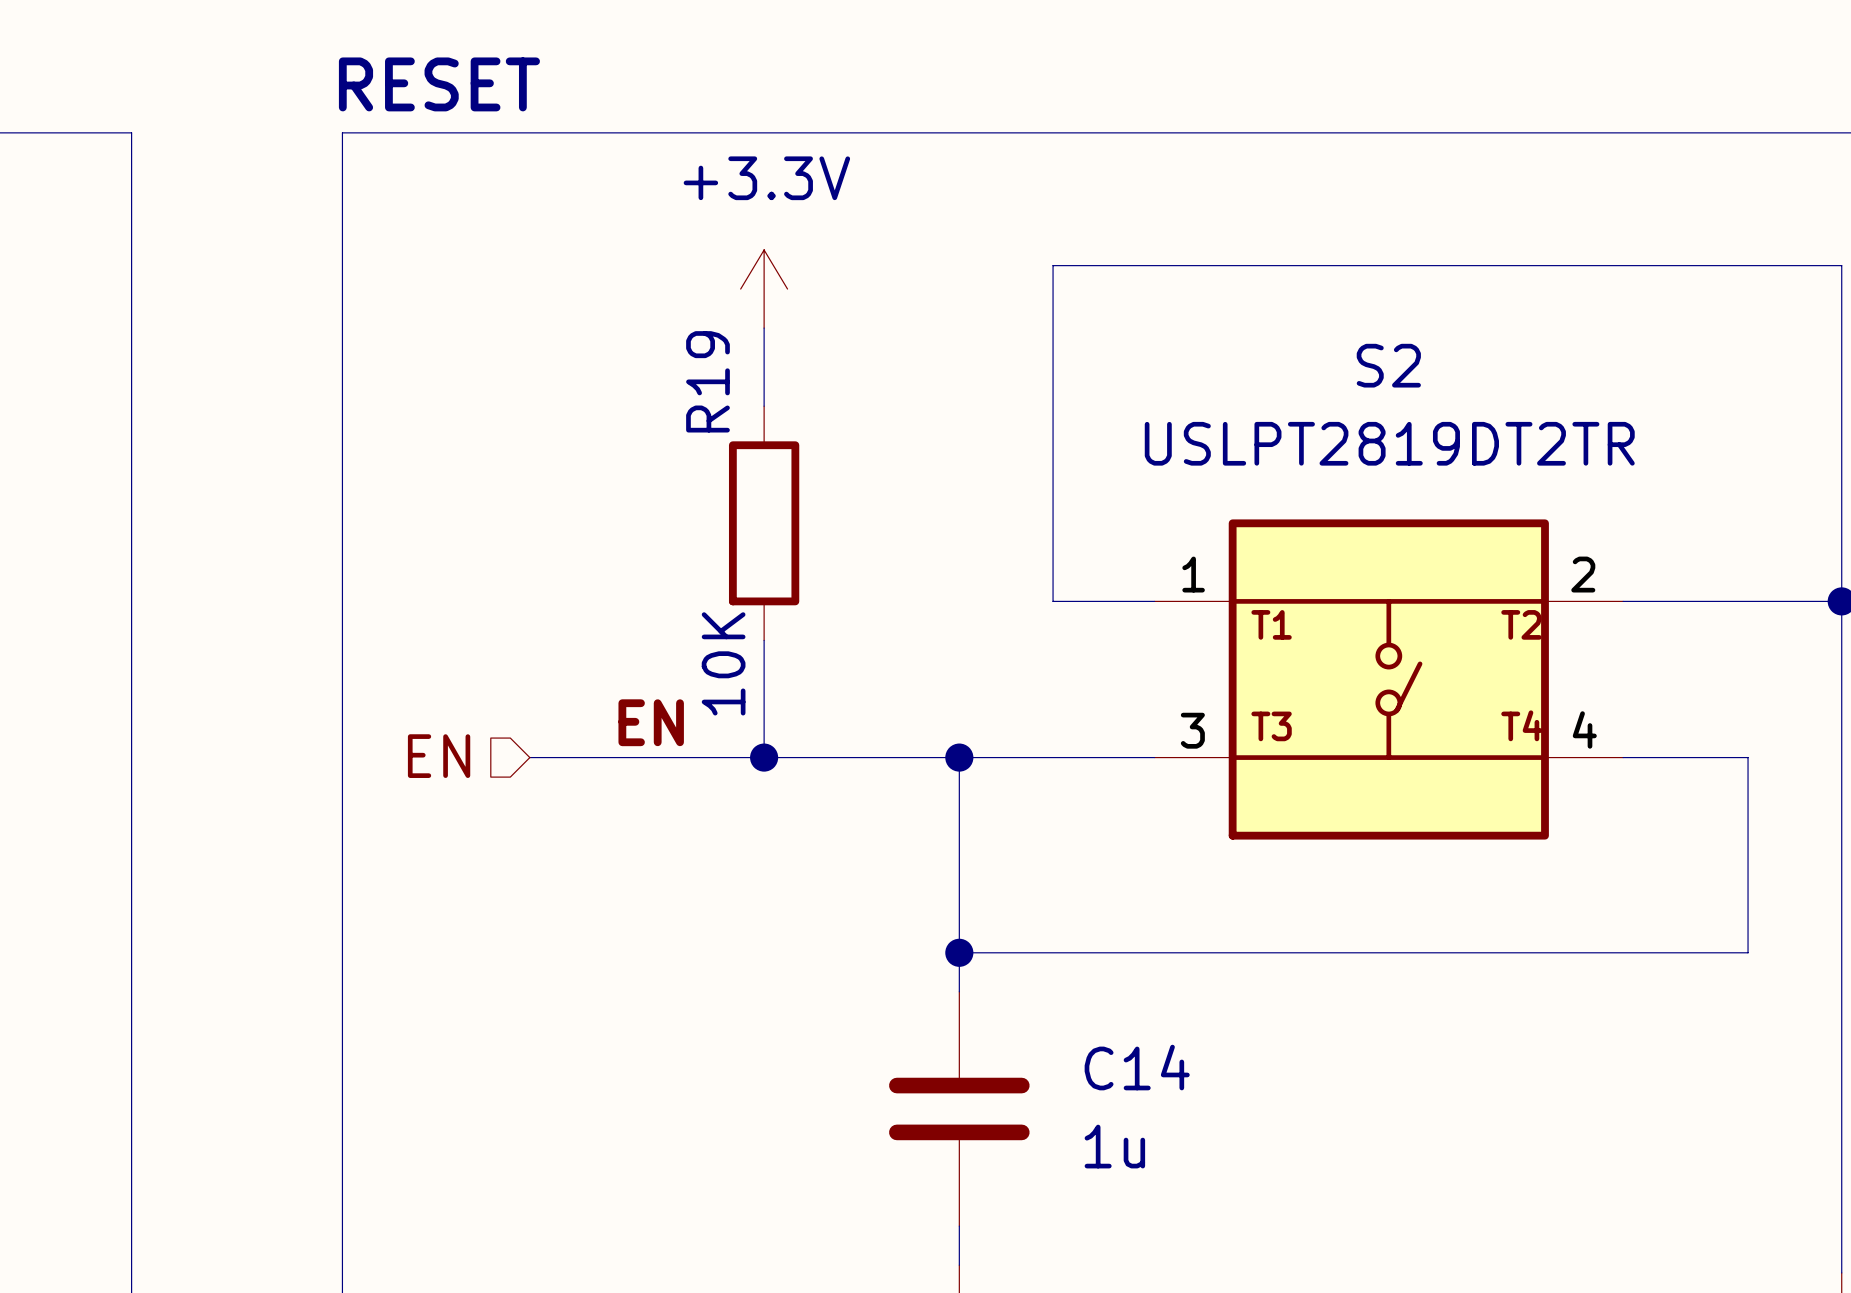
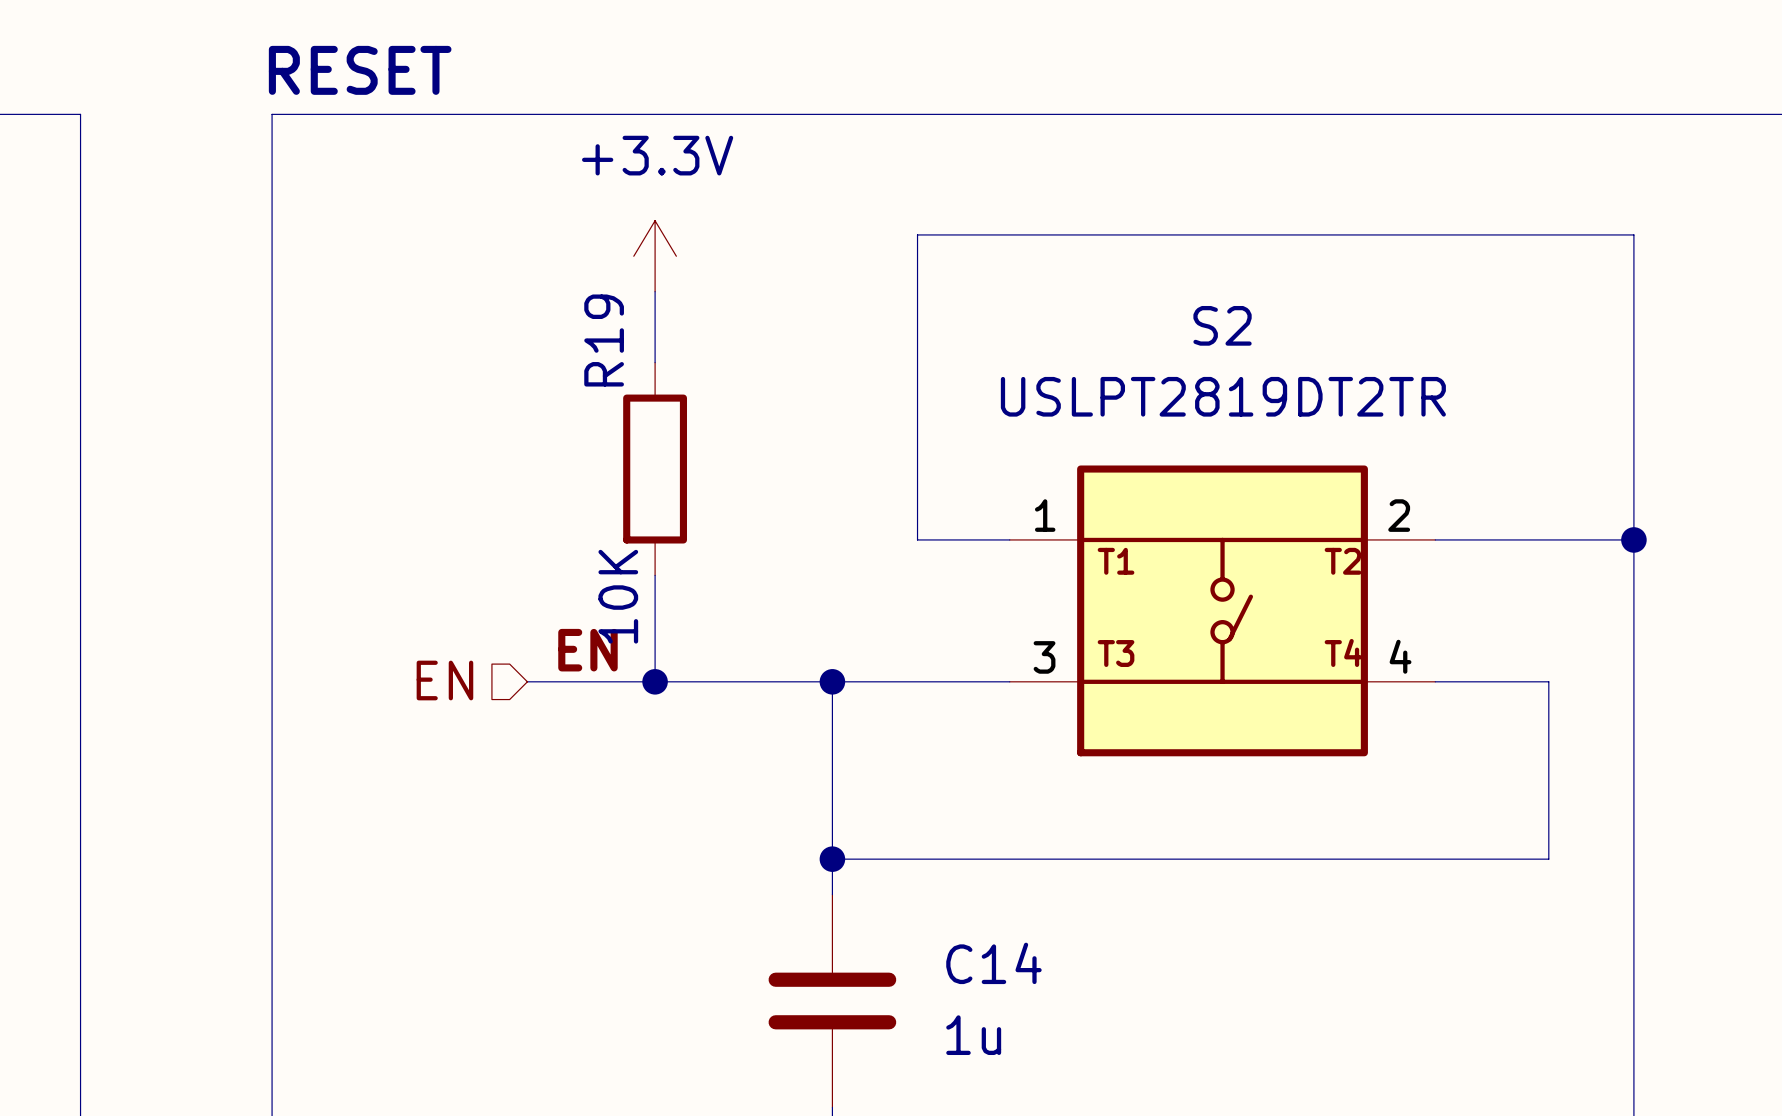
label position: EN (651, 722) -> EN (587, 650)
hierarchical label position: EN (439, 756) -> EN (444, 680)
wire: (529, 757) (623, 757) -> none

